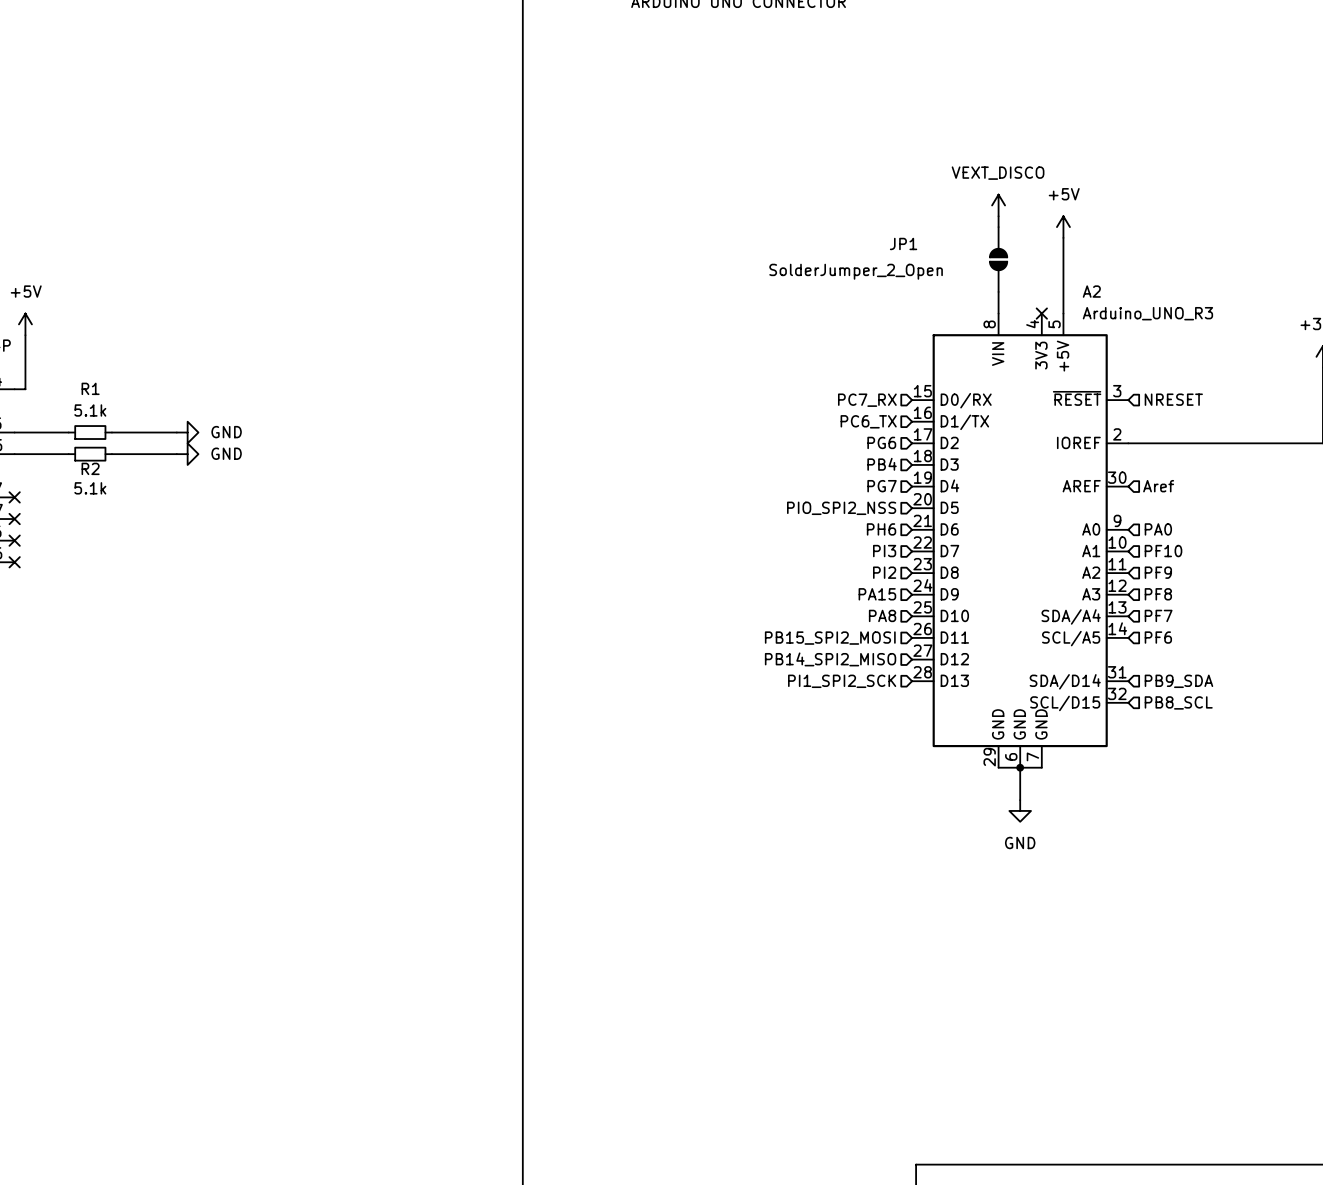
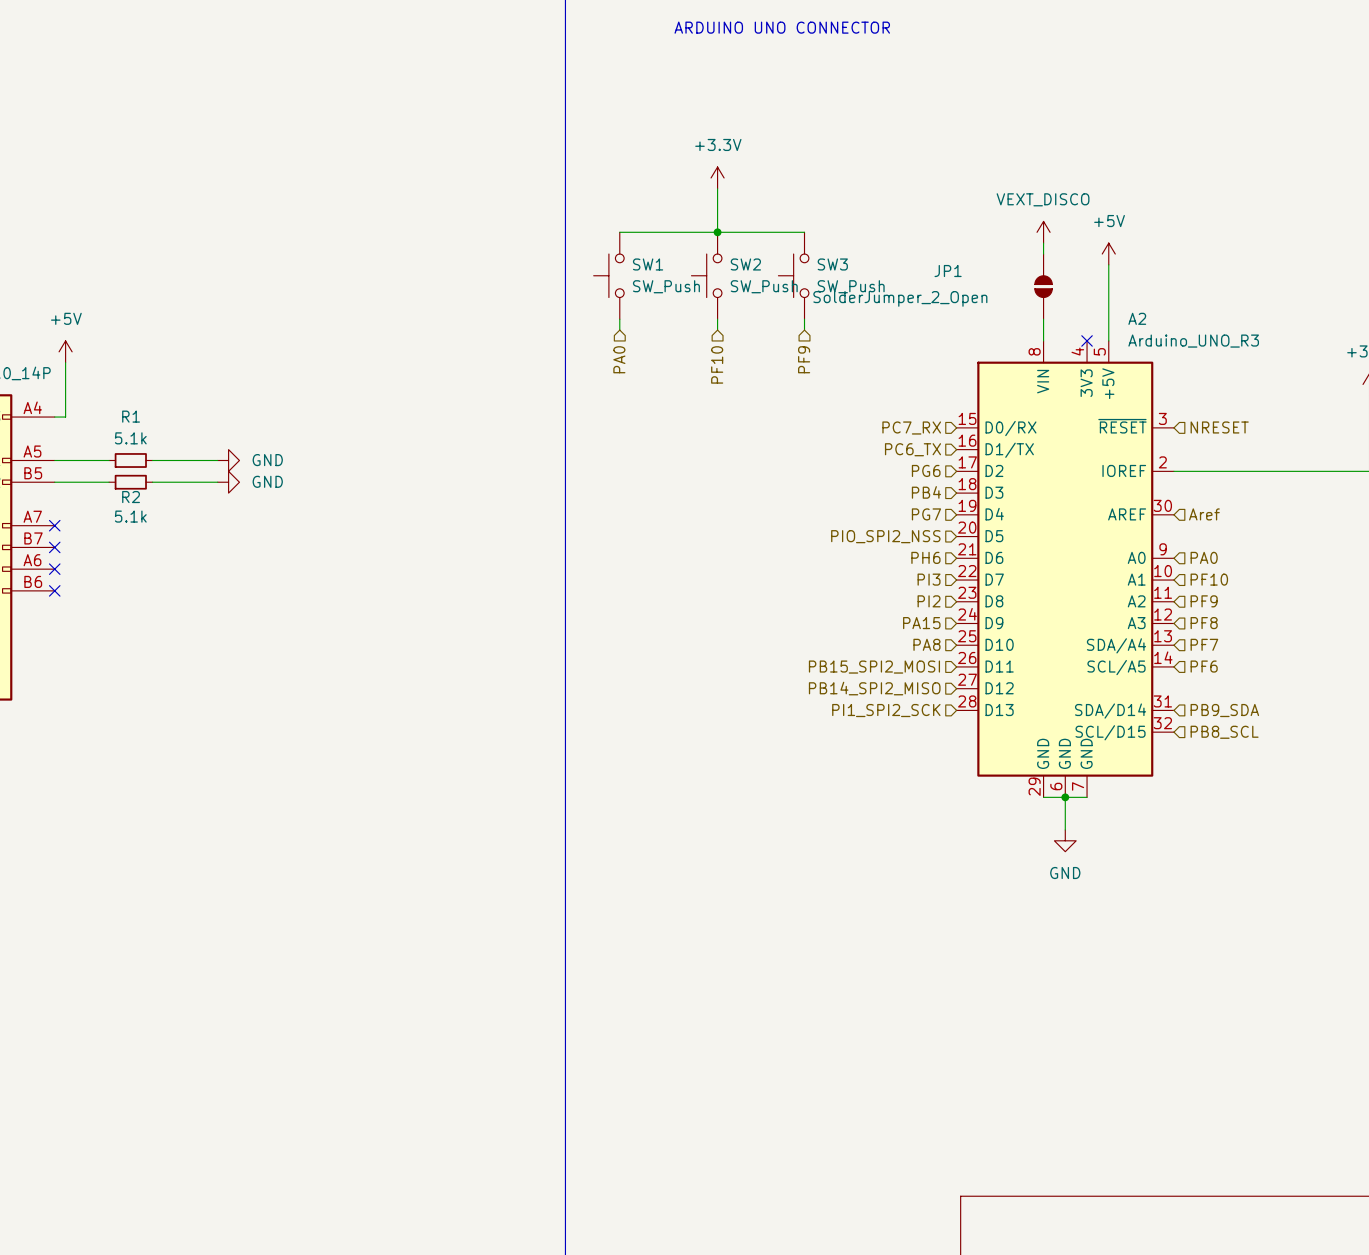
power symbol: none -> +3.3V (717, 177)
wire: none -> (717, 188) (717, 232)
wire: none -> (619, 232) (804, 232)
junction: none -> (717, 232)
SW1: none -> SW_Push (608, 275)
SW2: none -> SW_Push (706, 275)
SW3: none -> SW_Push (793, 275)
wire: none -> (619, 319) (619, 330)
wire: none -> (717, 319) (717, 330)
wire: none -> (804, 319) (804, 330)
hierarchical label: none -> PA0 (619, 359)
hierarchical label: none -> PF9 (804, 359)
hierarchical label: none -> PF10 (717, 364)

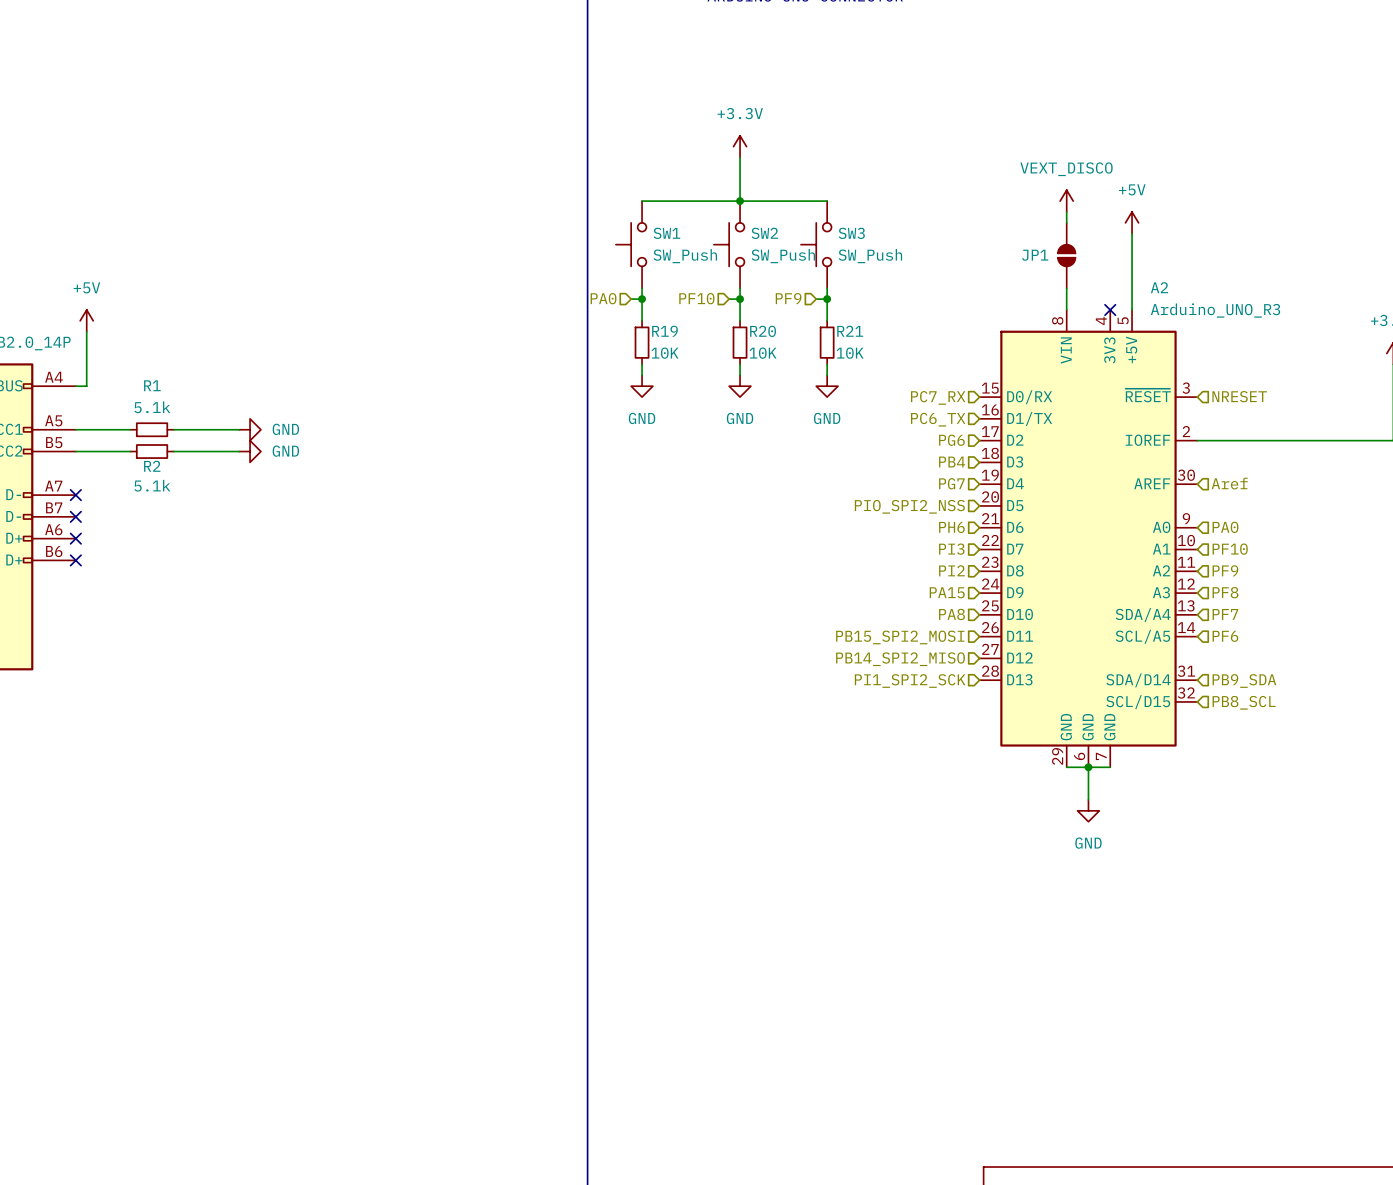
JP1 name position: JP1 (948, 271) -> JP1 (1035, 255)
JP1 value: SolderJumper_2_Open (900, 298) -> none
wire: none -> (631, 299) (642, 299) (642, 320)
junction: none -> (642, 299)
wire: none -> (729, 299) (740, 299) (740, 320)
junction: none -> (740, 299)
wire: none -> (816, 299) (827, 299) (827, 320)
junction: none -> (827, 299)
hierarchical label rotation: 0° (619, 359) -> 90° clockwise (603, 298)
hierarchical label position: PA0 (619, 359) -> PA0 (603, 298)
hierarchical label rotation: 0° (804, 359) -> 90° clockwise (788, 298)
hierarchical label position: PF9 (804, 359) -> PF9 (788, 298)
hierarchical label rotation: 0° (717, 364) -> 90° clockwise (696, 298)
hierarchical label position: PF10 (717, 364) -> PF10 (696, 298)
R19: none -> 10K (642, 342)
R20: none -> 10K (740, 342)
R21: none -> 10K (827, 342)
wire: none -> (642, 364) (642, 375)
wire: none -> (740, 364) (740, 375)
wire: none -> (827, 364) (827, 375)
power symbol: none -> GND (642, 386)
power symbol: none -> GND (740, 386)
power symbol: none -> GND (827, 386)

